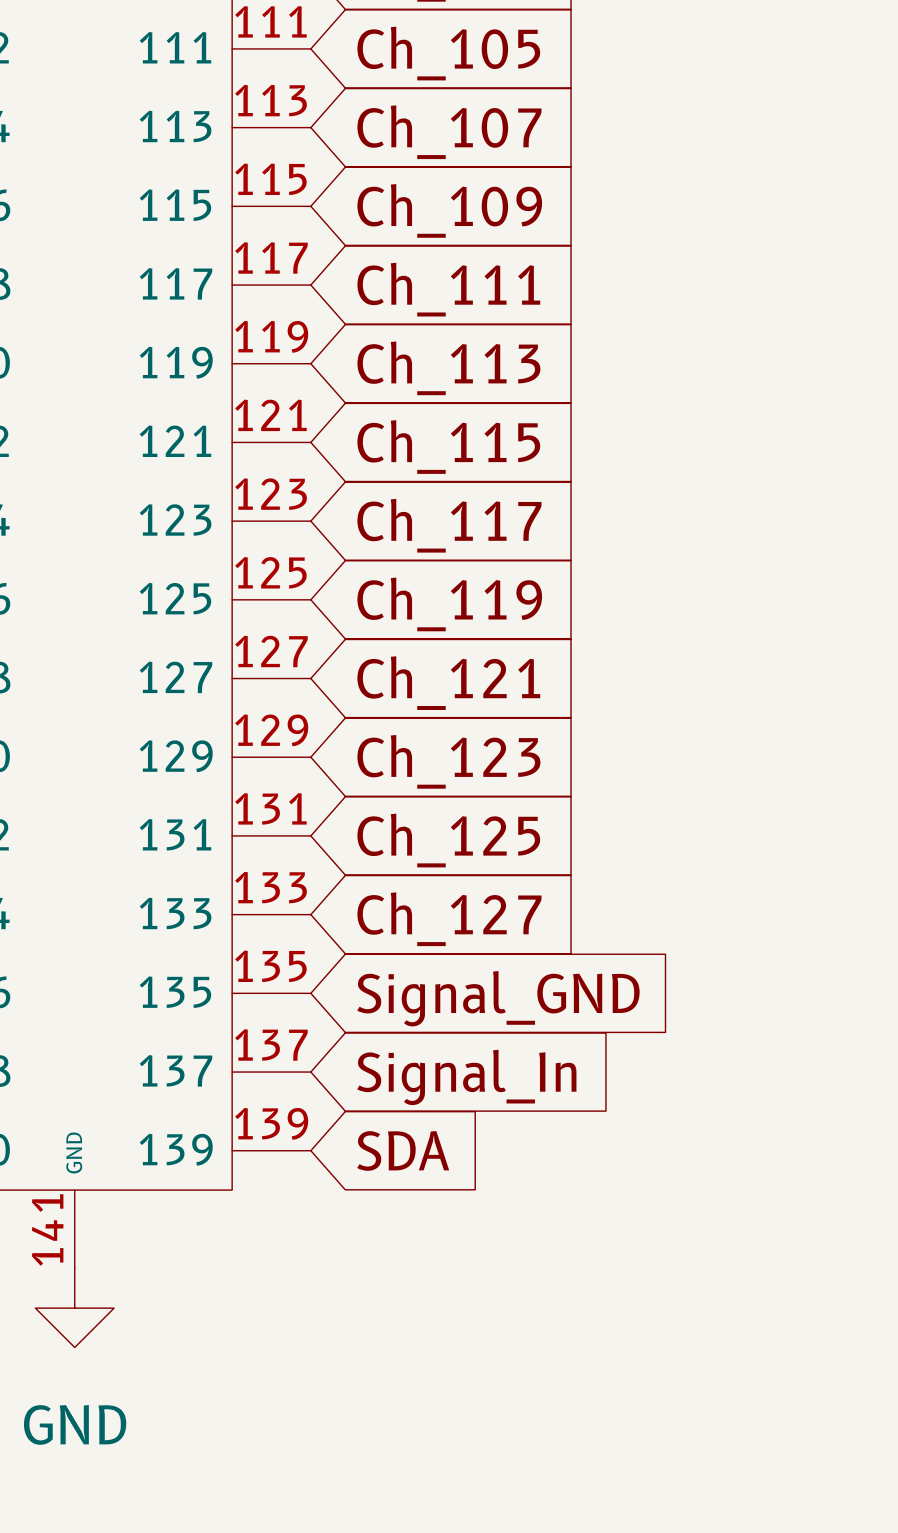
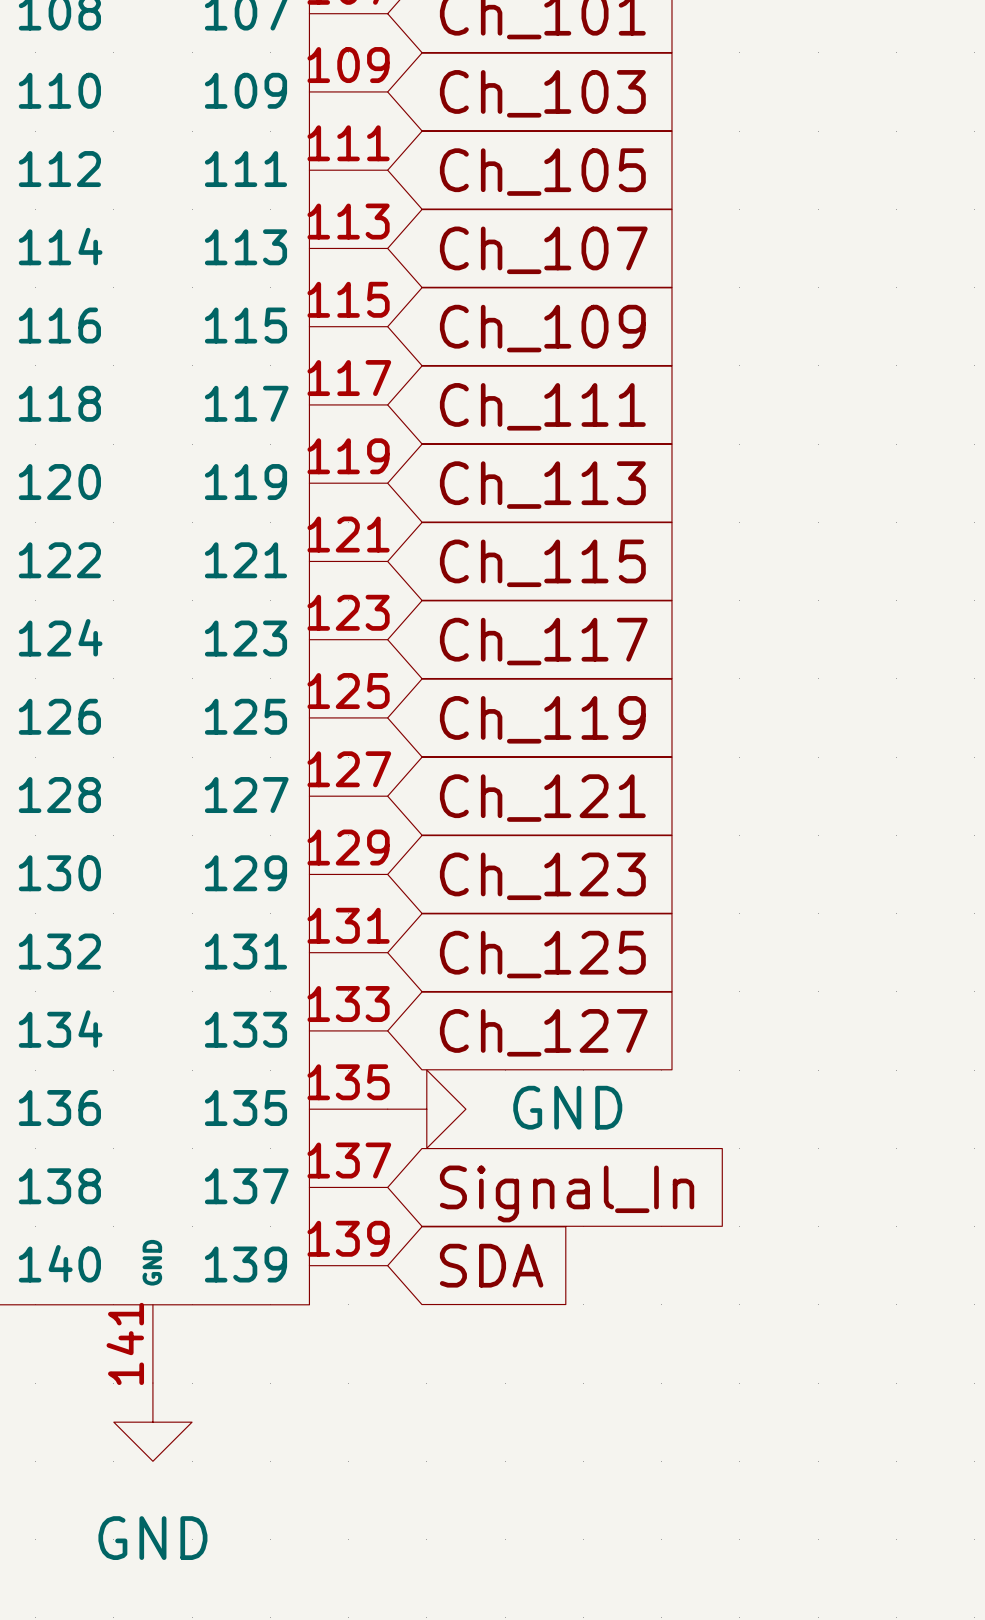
power symbol: none -> GND (426, 1109)
global label: Signal_GND (498, 998) -> none

